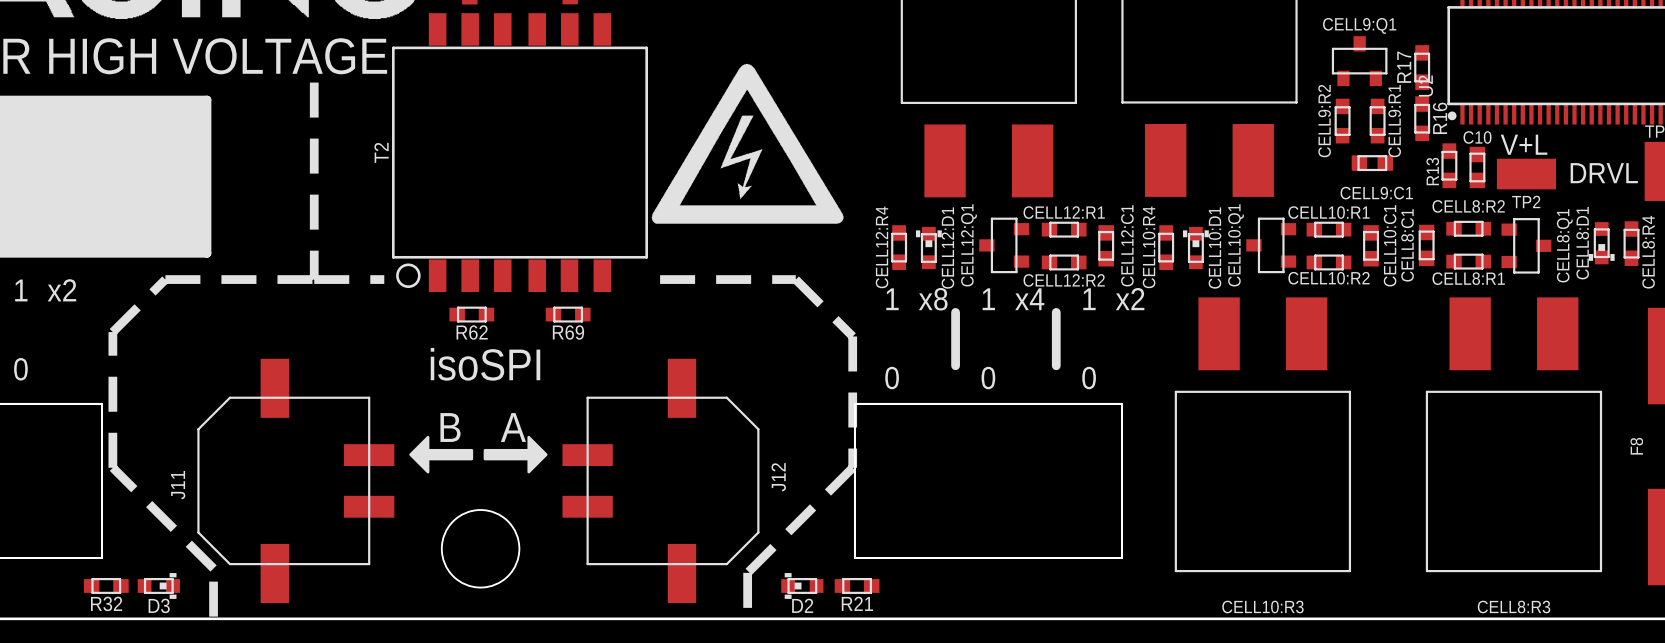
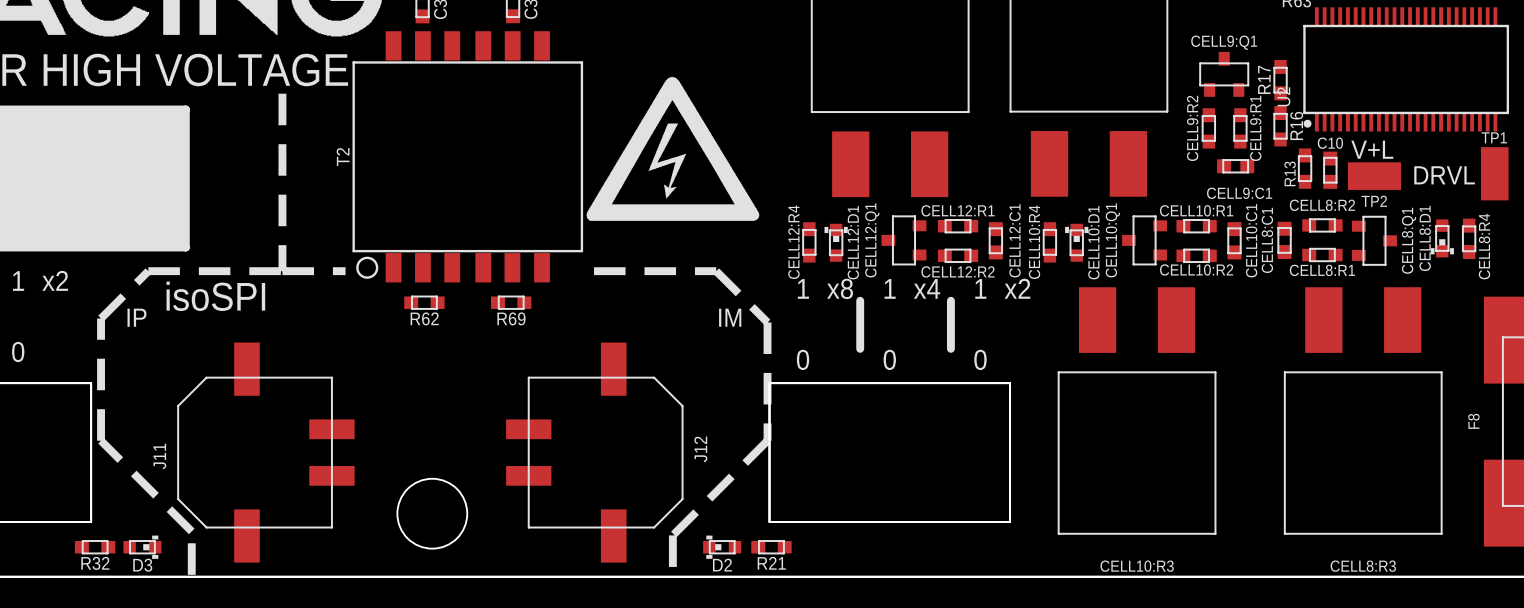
text: none -> IP (137, 317)
text: none -> IM (730, 317)
text position: isoSPI (485, 364) -> isoSPI (215, 296)
text: B (450, 427) -> none
text: A (513, 427) -> none
drawing: [409, 435, 548, 474] -> none

